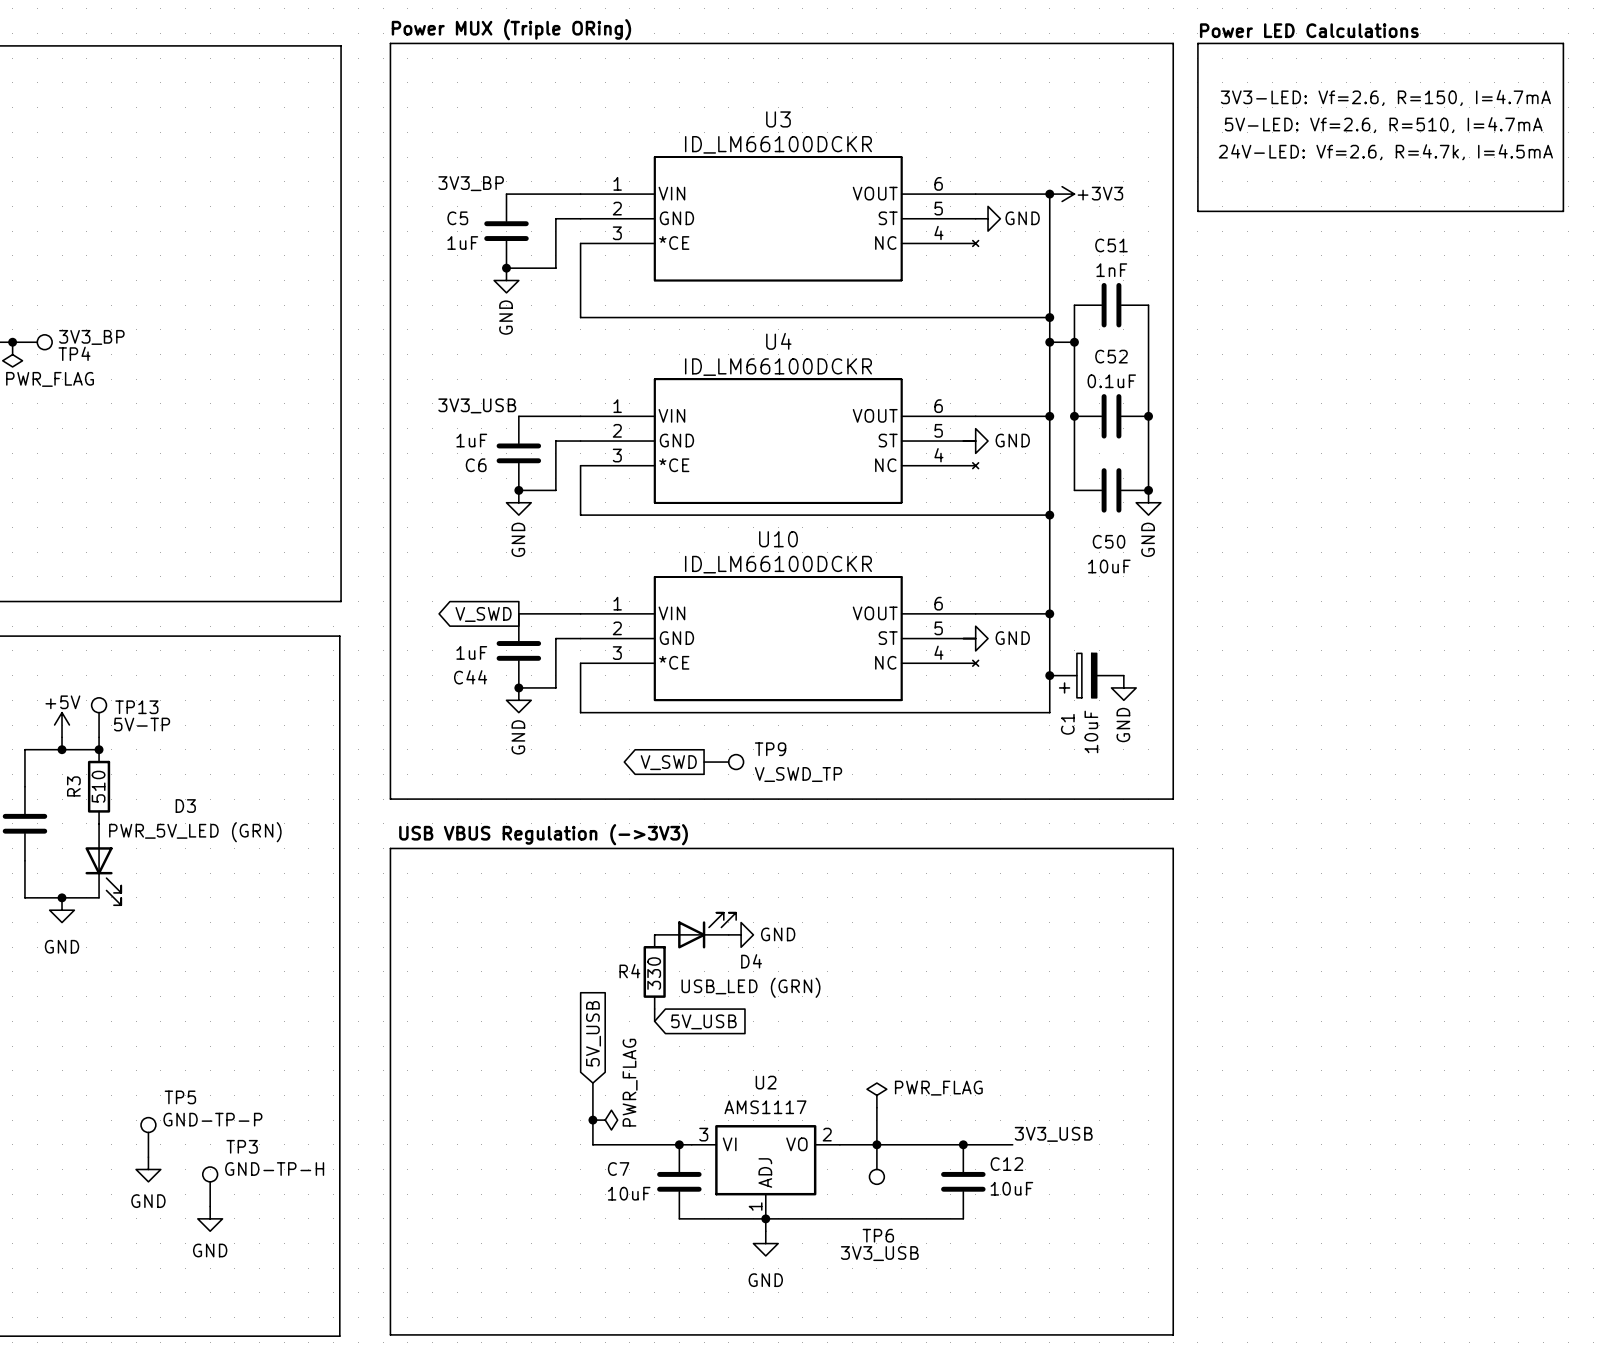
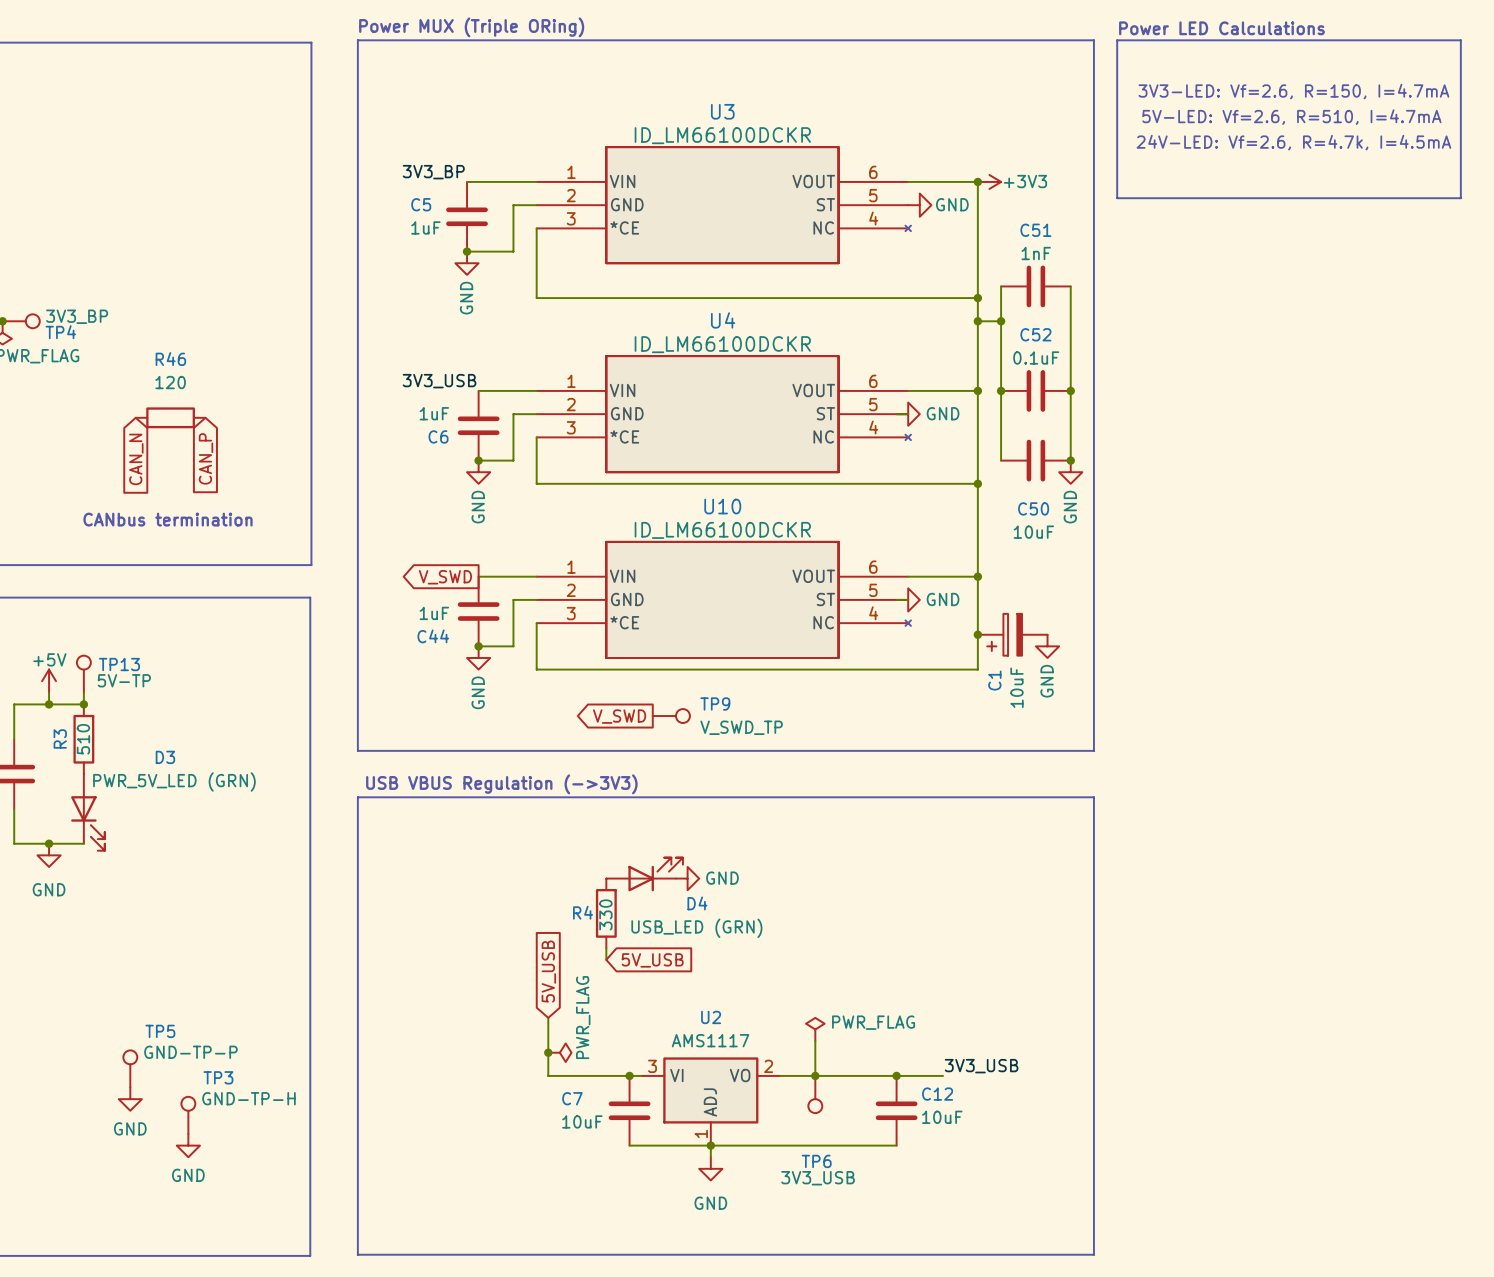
R46: none -> 120 (170, 417)
global label: none -> CAN_P (205, 458)
global label: none -> CAN_N (136, 459)
text: none -> CANbus termination (168, 519)

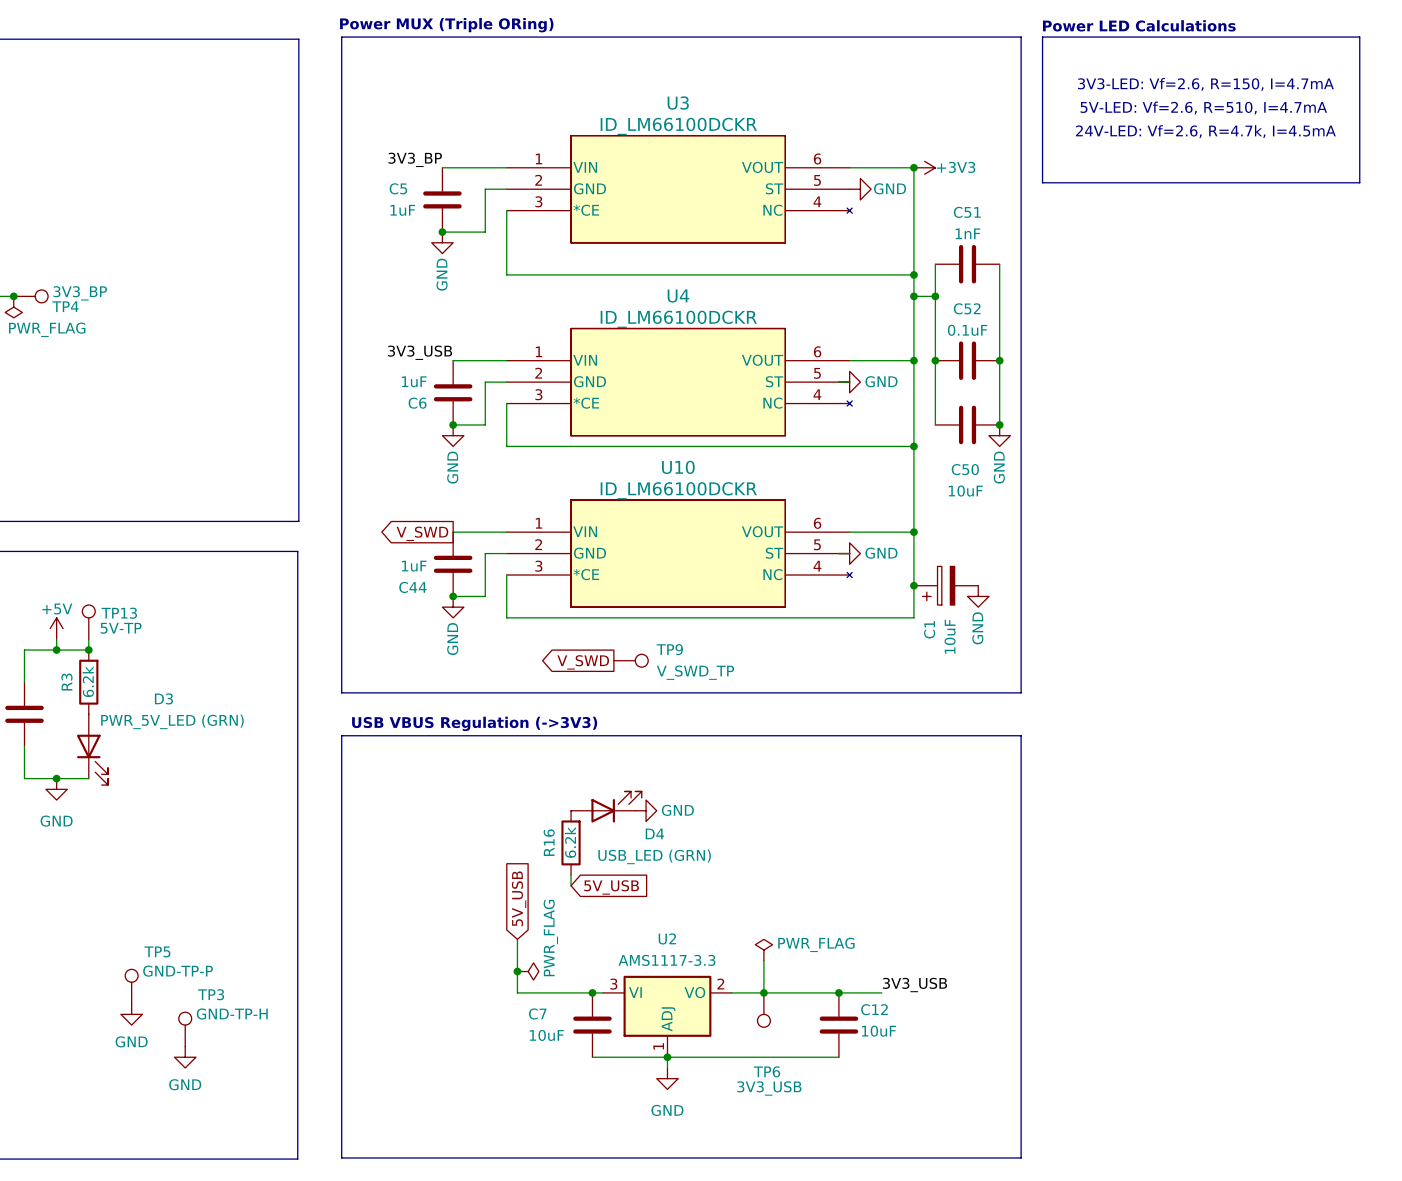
R46: 120 (170, 417) -> none
global label: CAN_P (205, 458) -> none
global label: CAN_N (136, 459) -> none
text: CANbus termination (168, 519) -> none
R3 value: 510 (83, 739) -> 6.2k (88, 681)
R4 name: R4 (583, 912) -> R16 (549, 842)
R4 value: 330 (605, 914) -> 6.2k (570, 842)
U2 value: AMS1117 (710, 1040) -> AMS1117-3.3 (666, 960)

